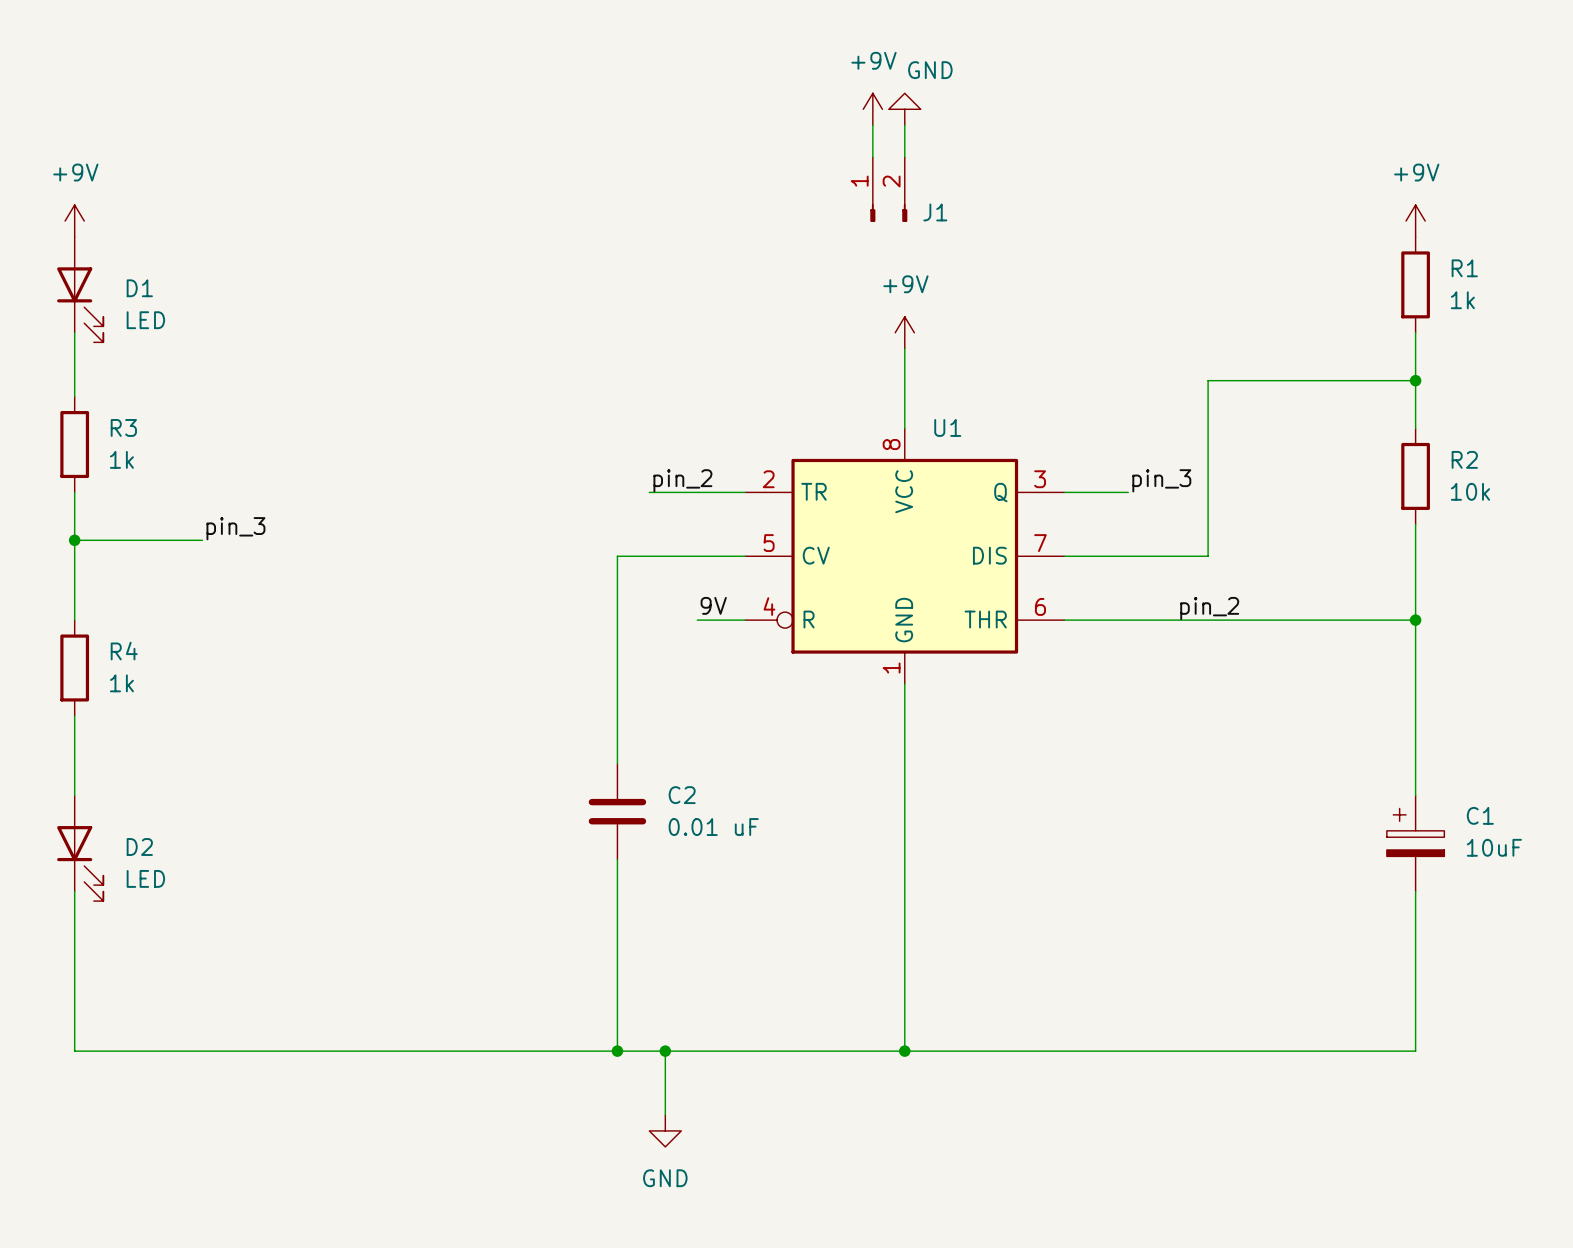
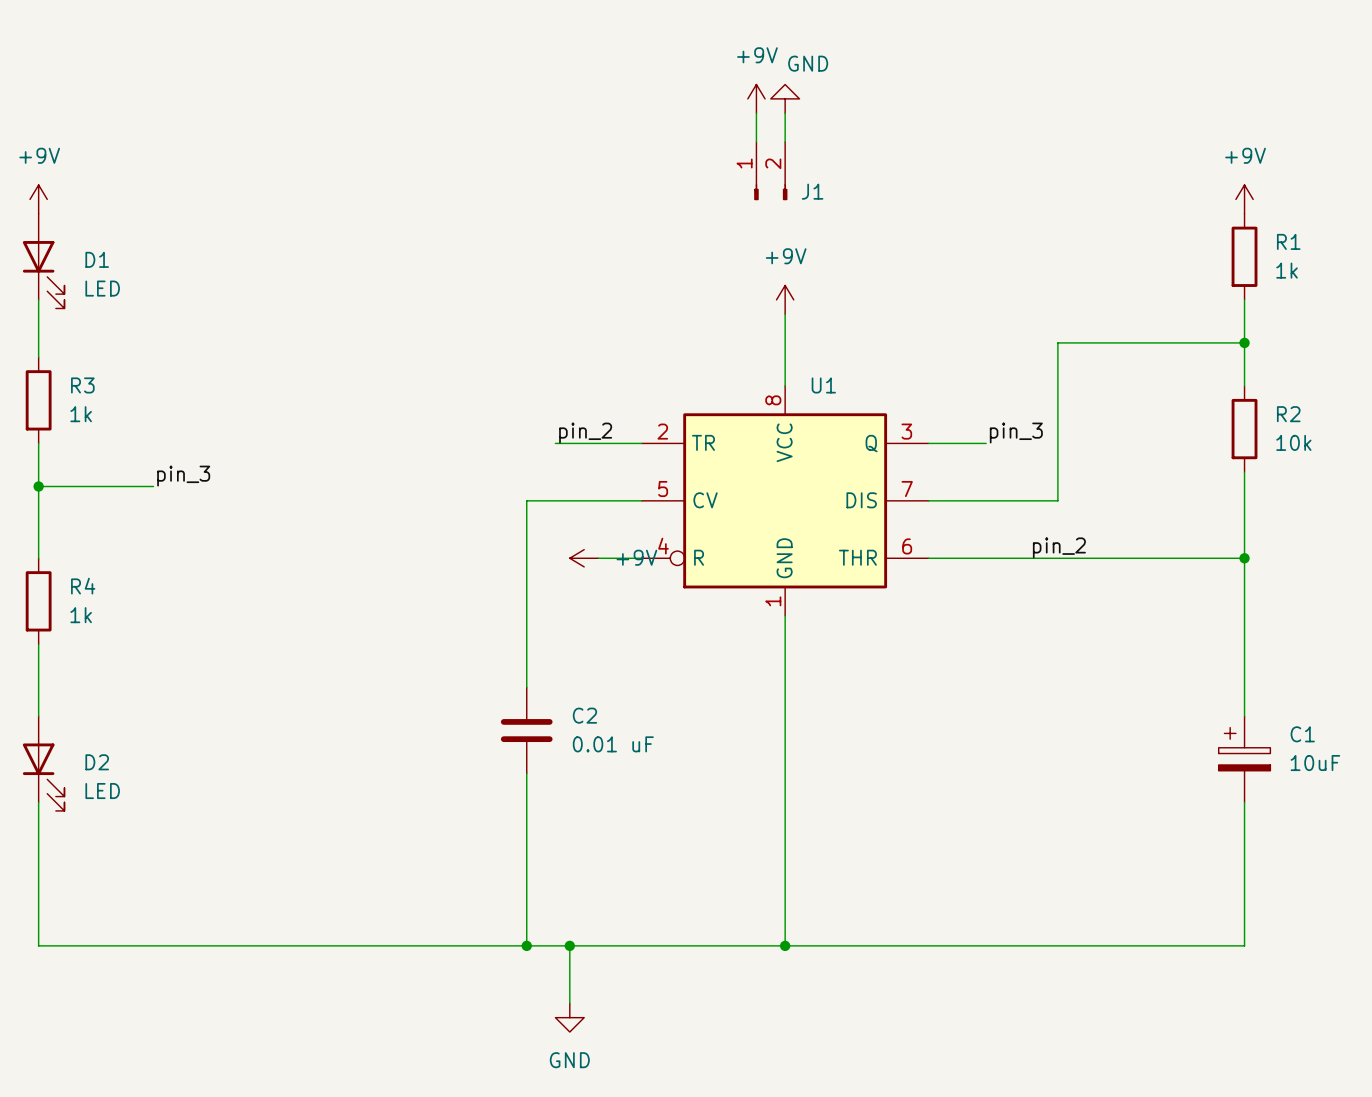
label: 9V (713, 605) -> none
power symbol: none -> +9V (584, 558)

